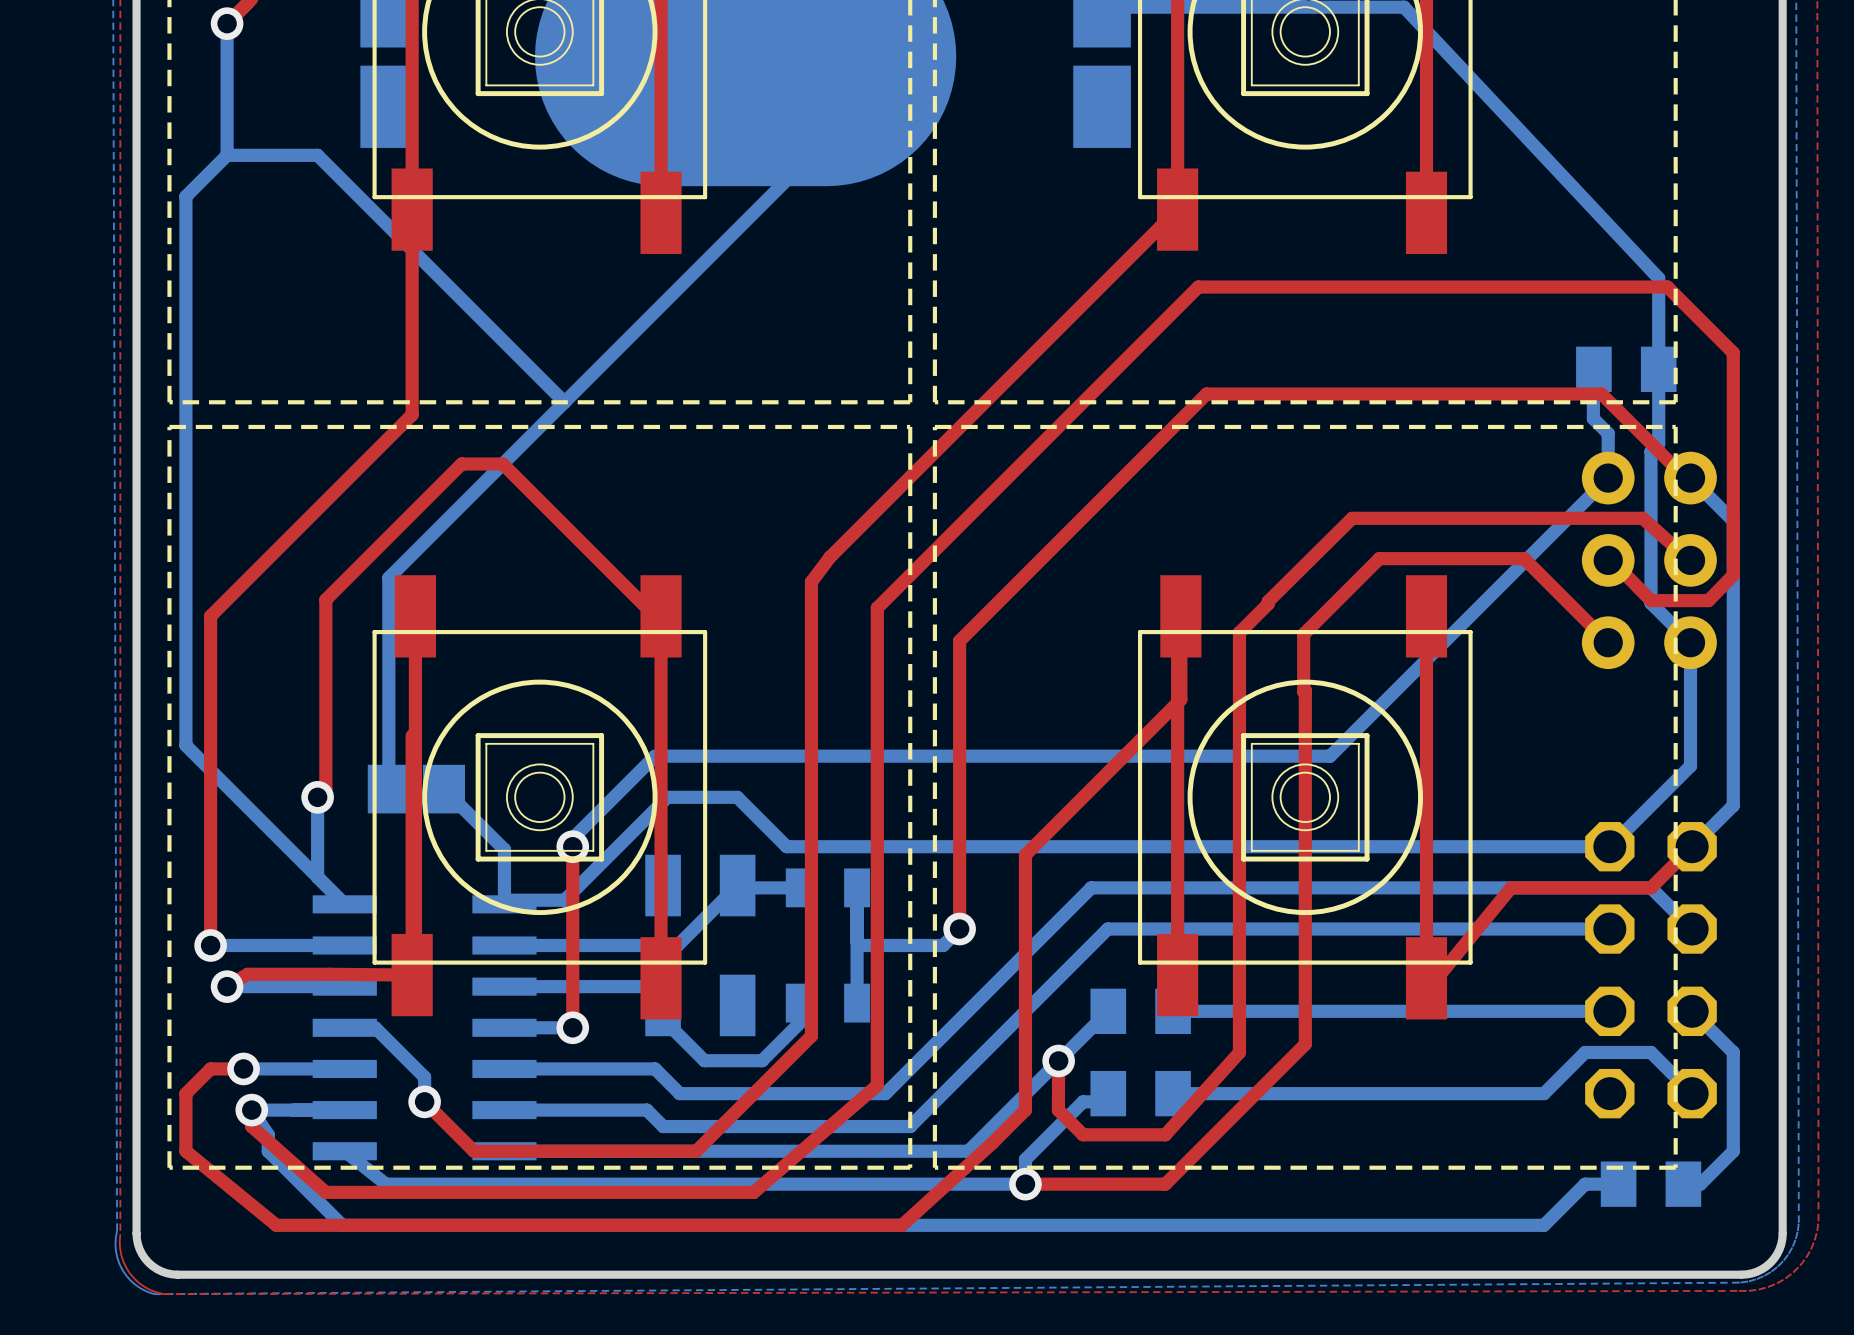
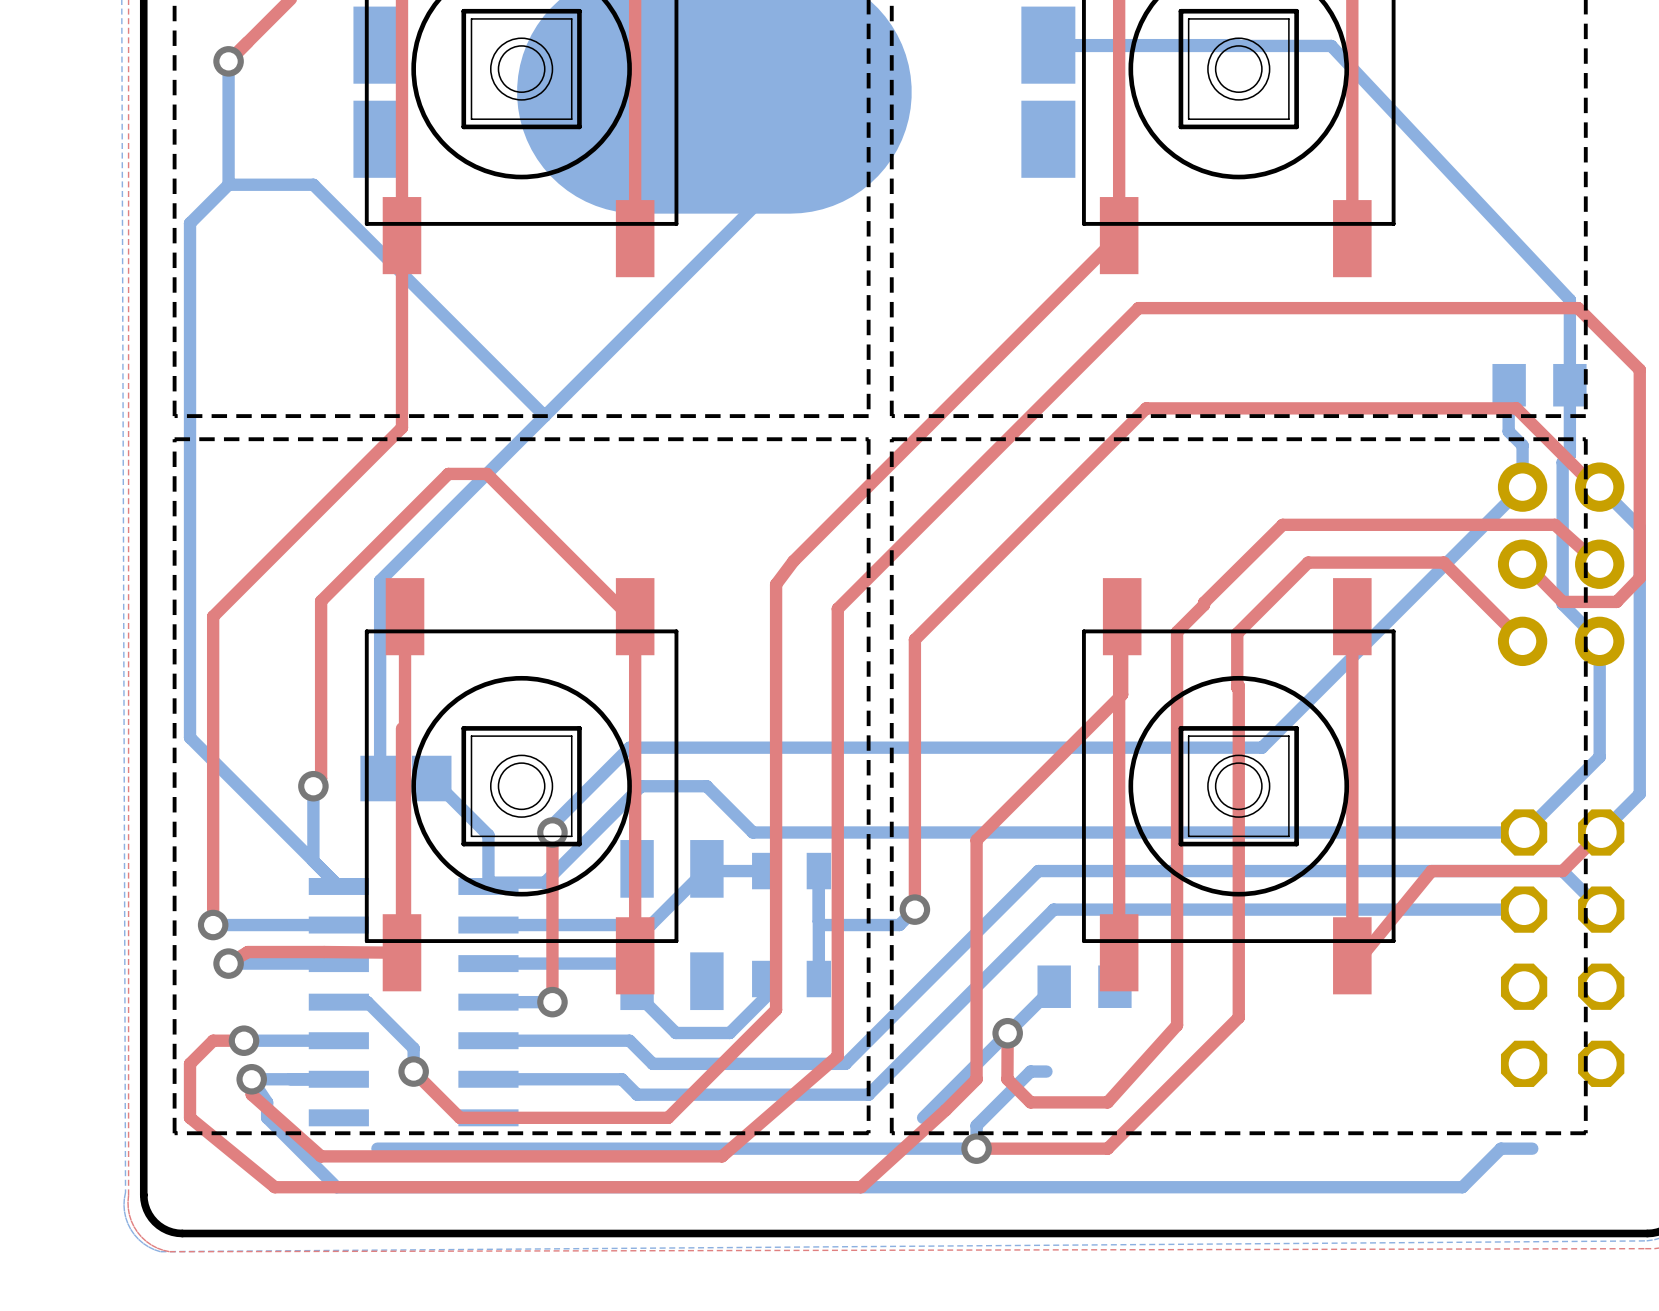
bottom track: (1173, 1011) (1609, 1011) -> none
bottom track: (1692, 1011) (1733, 1052) (1733, 1151) (1700, 1184) (1683, 1184) -> none
part: (1140, 1093) -> none
bottom track: (1173, 1093) (1543, 1093) (1585, 1052) (1650, 1052) (1692, 1093) -> none
bottom track: (344, 1151) (385, 1184) -> none
bottom track: (504, 1151) (968, 1151) -> none
part: (1650, 1184) -> none

